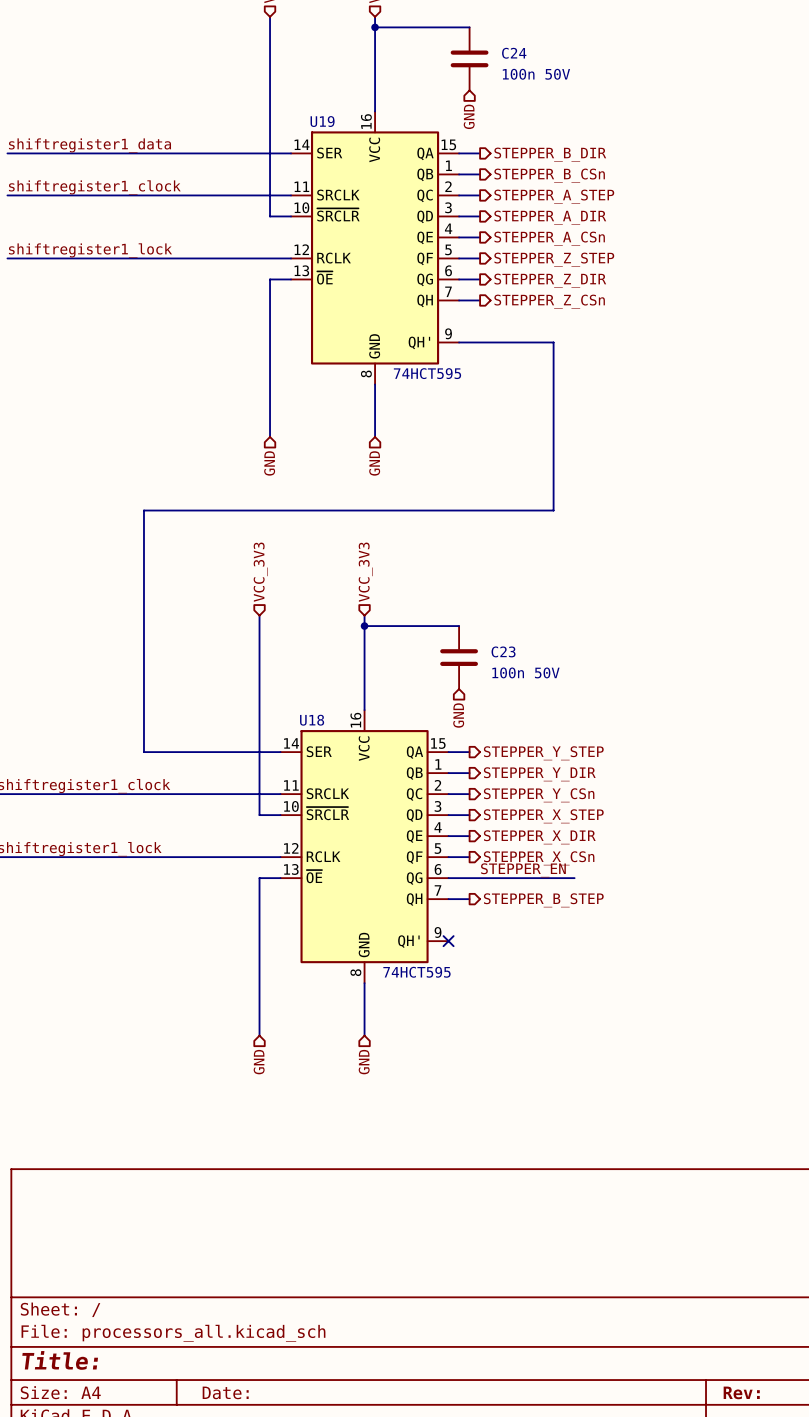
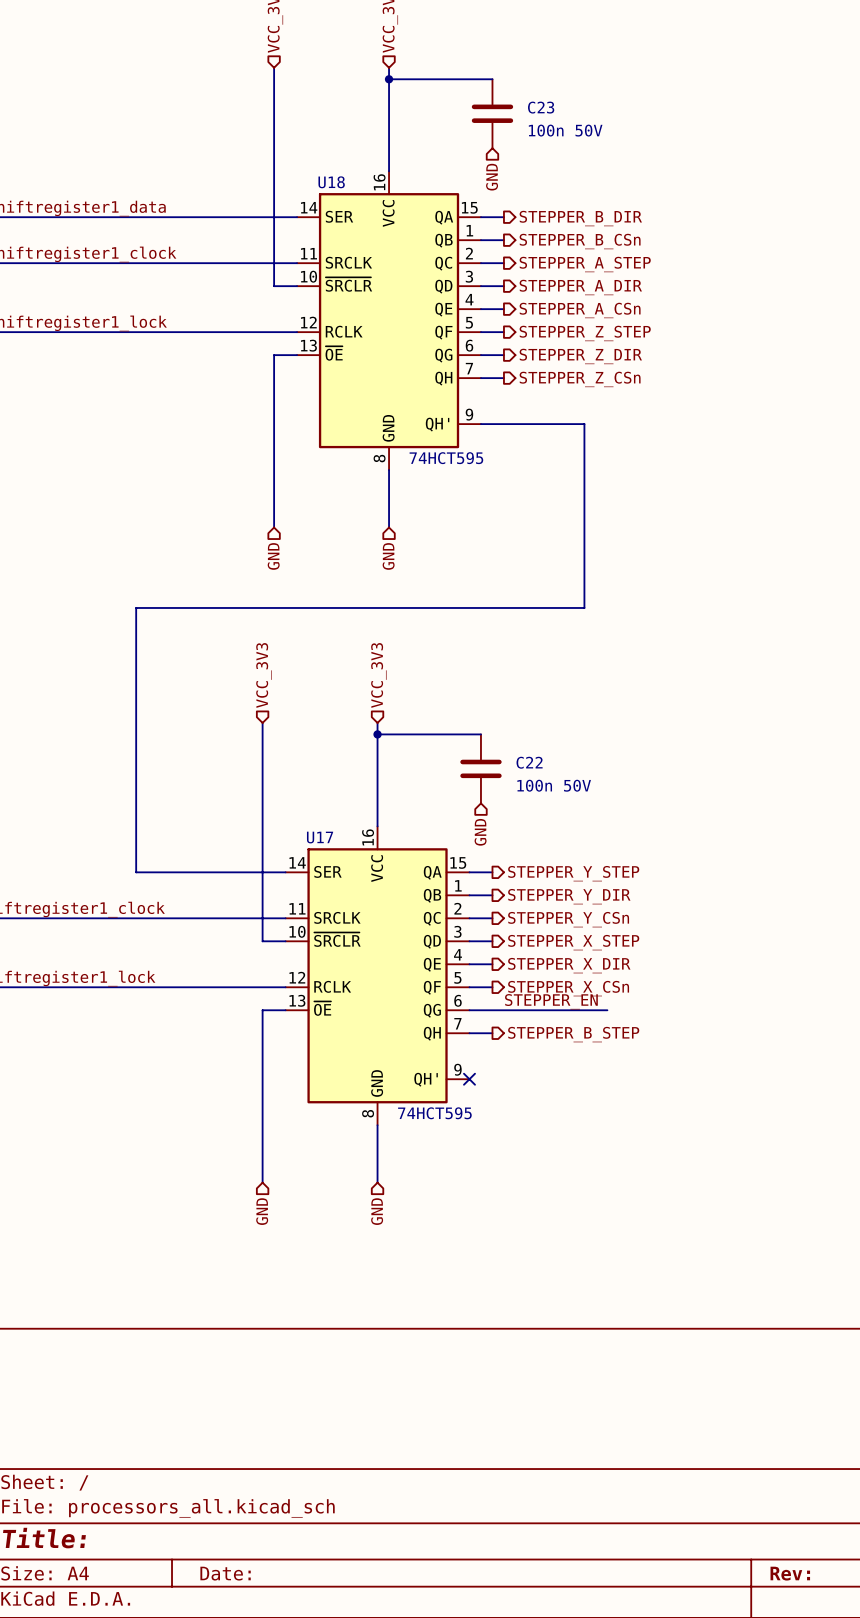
C24 name: C24 (514, 53) -> C23 (541, 107)
U19 name: U19 (322, 121) -> U18 (331, 182)
C23 name: C23 (503, 651) -> C22 (529, 762)
U18 name: U18 (312, 720) -> U17 (320, 837)

